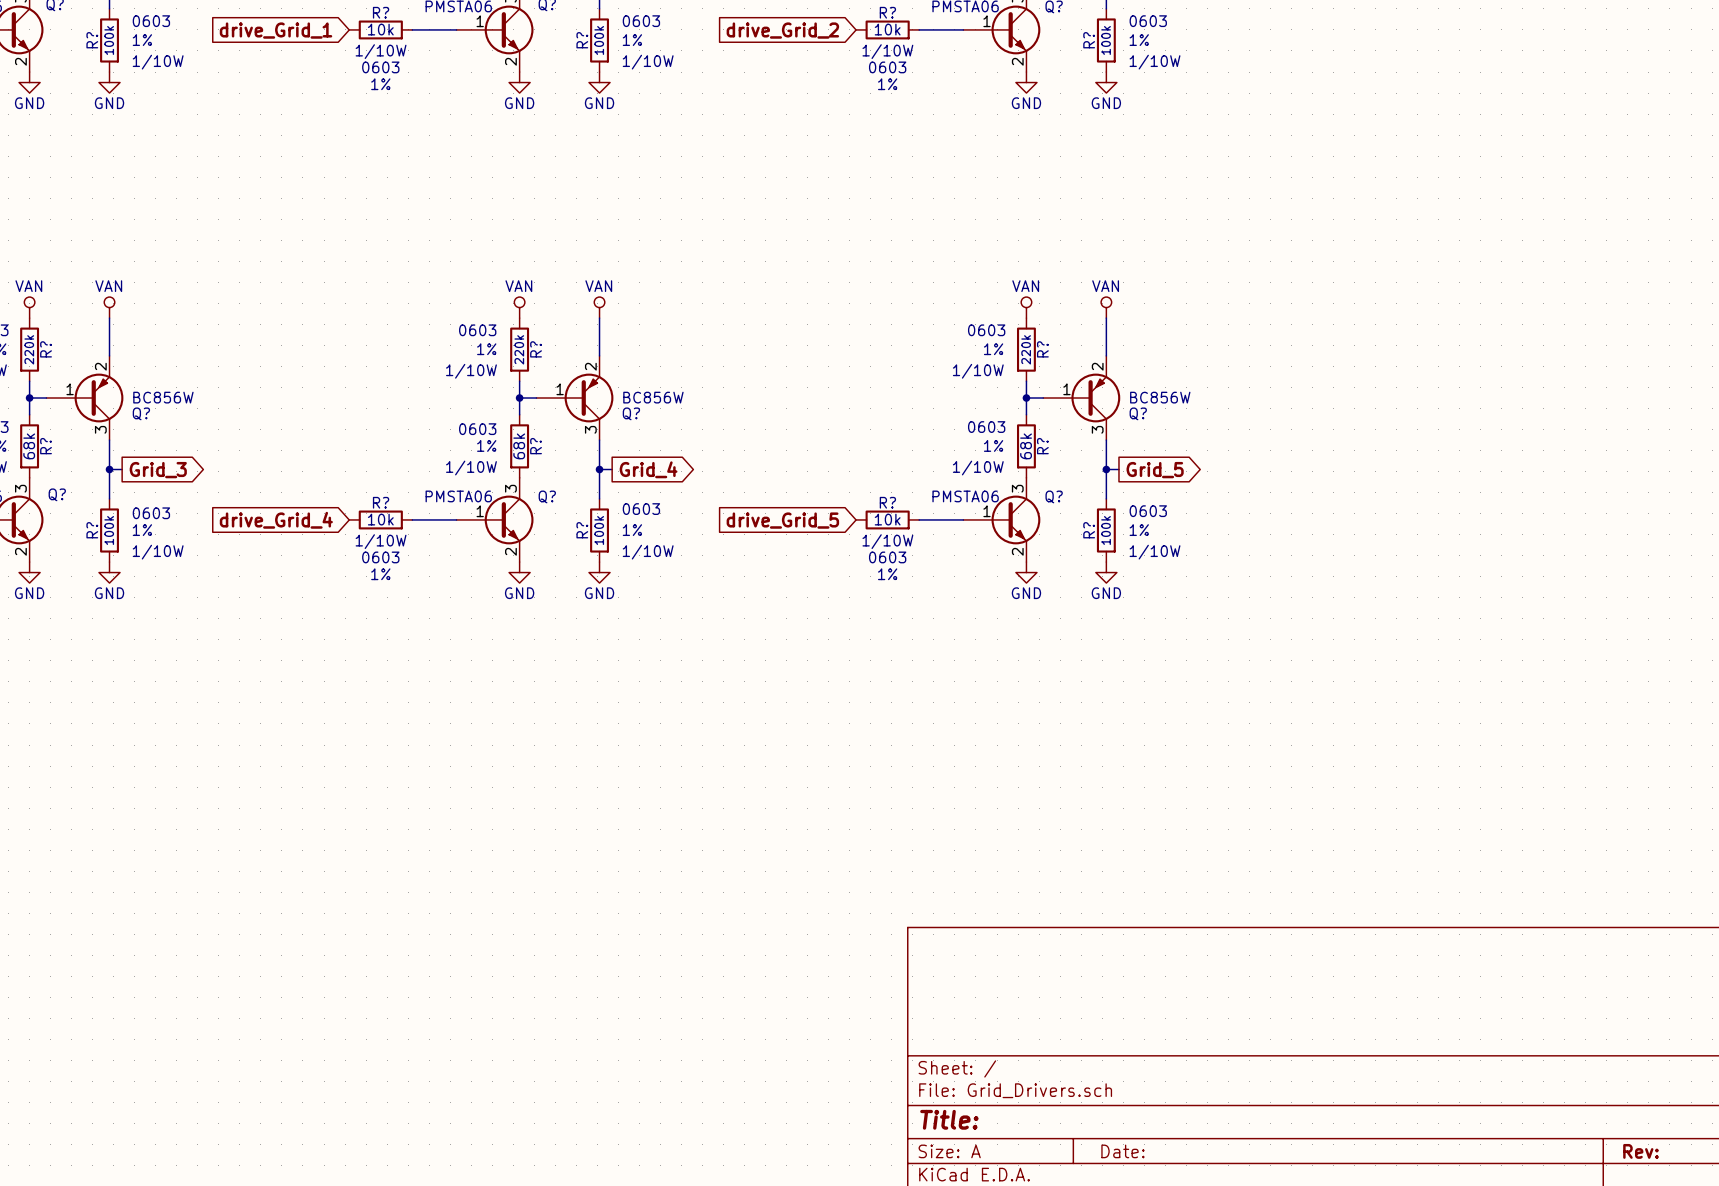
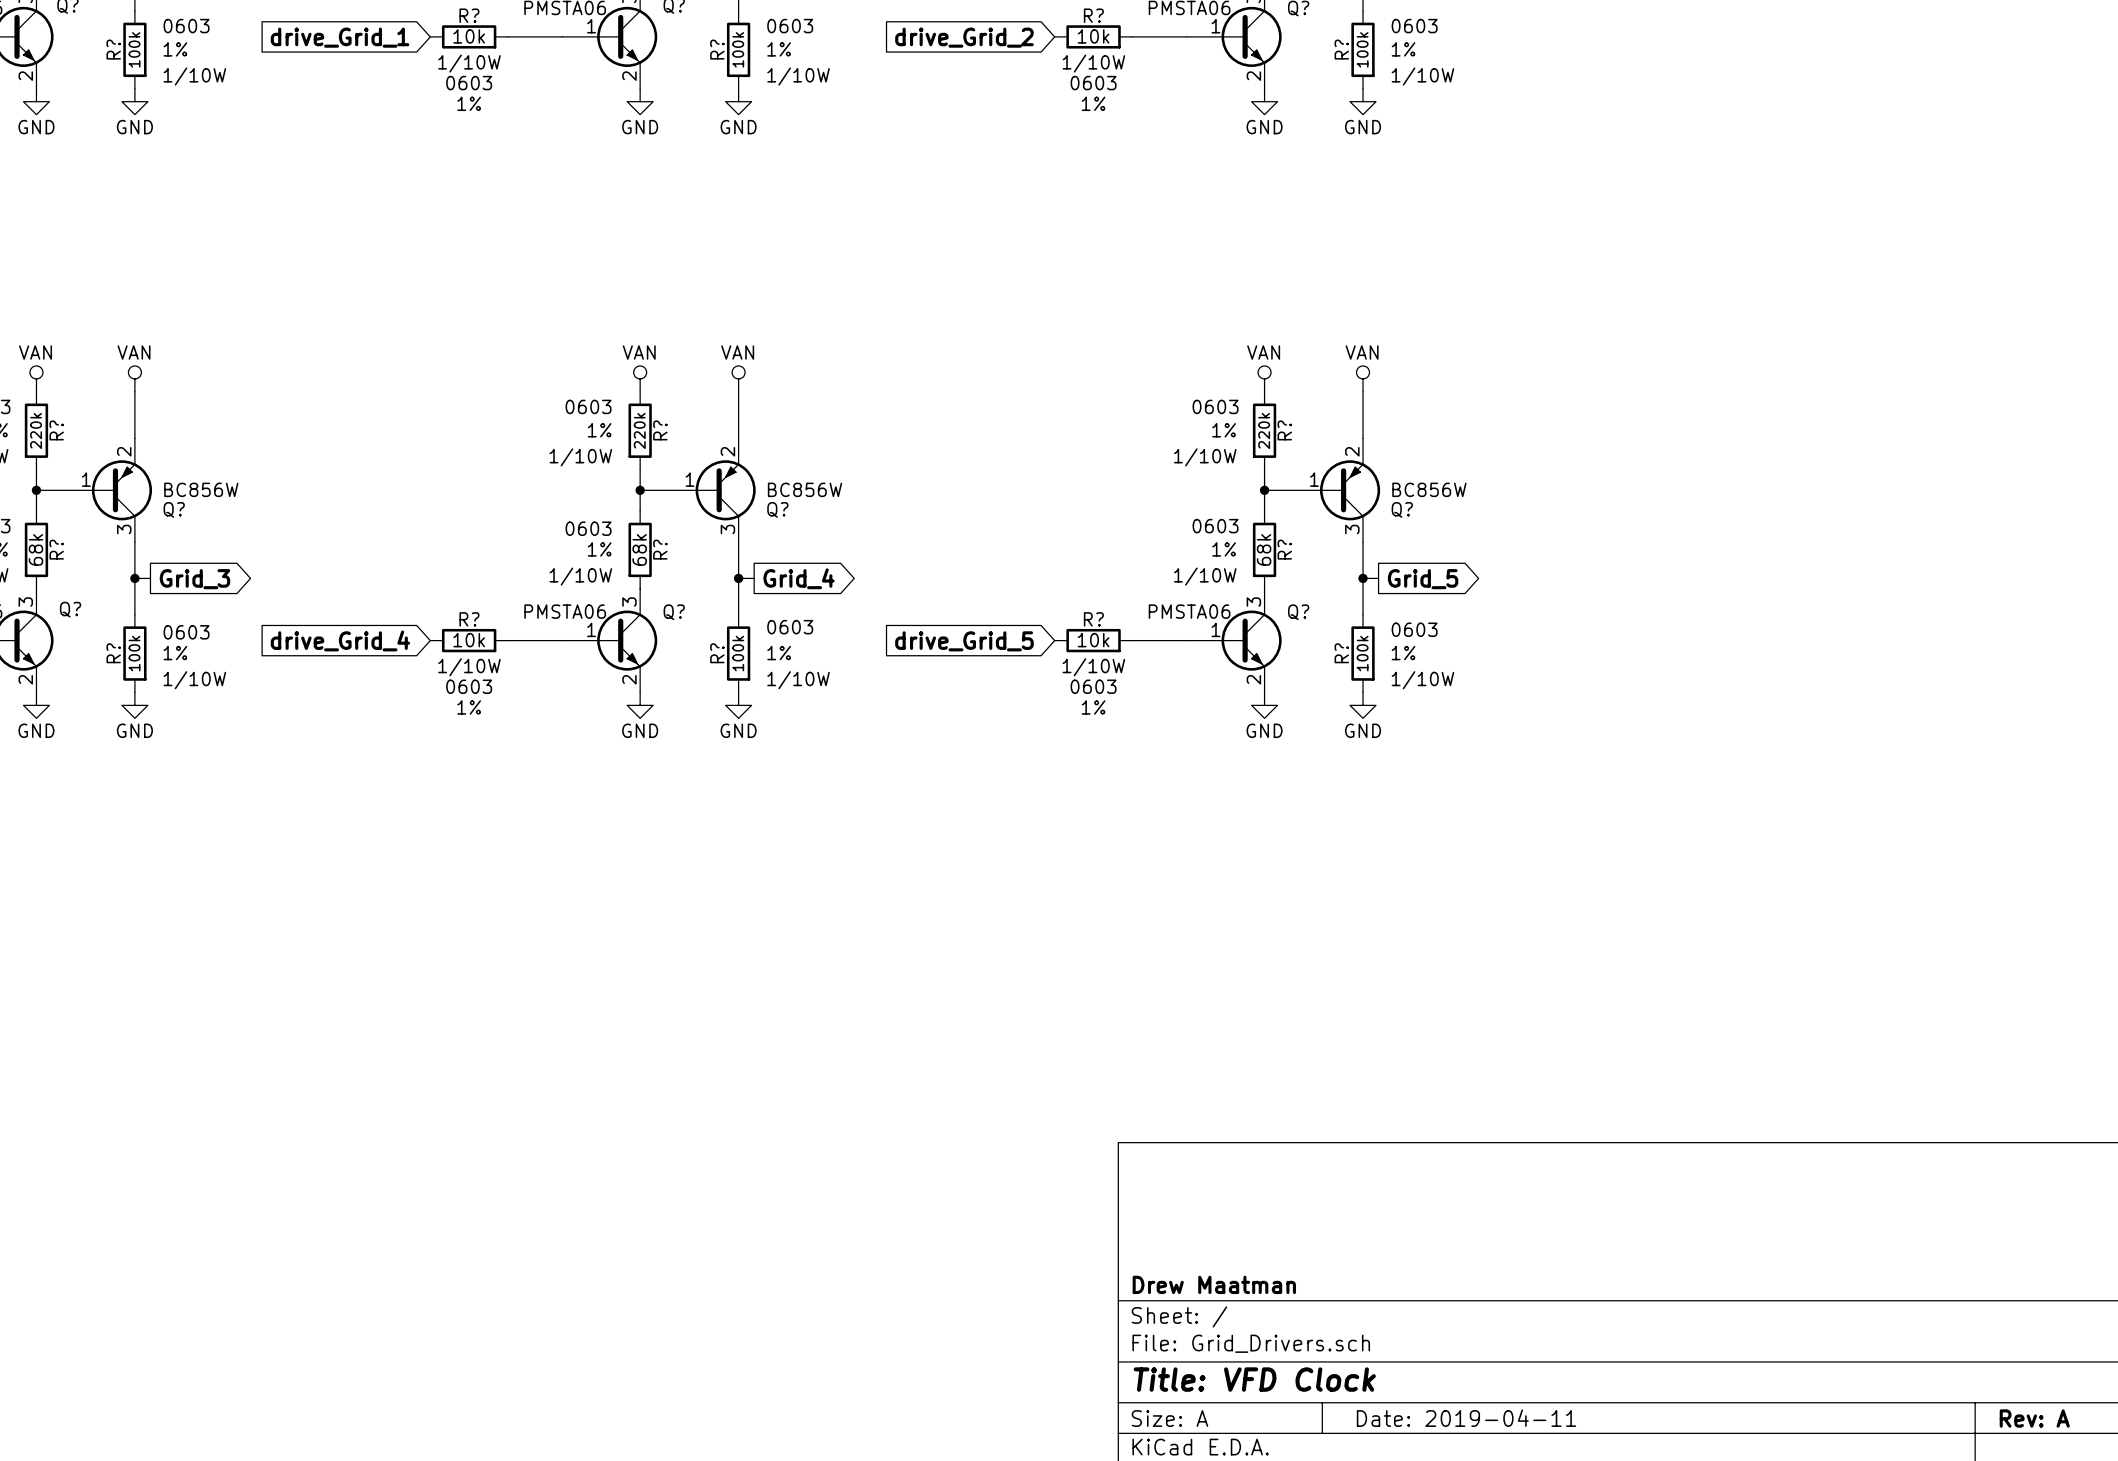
title block: none -> Drew Maatman (1214, 1284)
title block: Title: (949, 1119) -> Title: VFD Clock (1254, 1379)
title block: Date: (1122, 1151) -> Date: 2019-04-11 (1466, 1418)
title block: Rev: (1640, 1151) -> Rev: A (2034, 1418)

